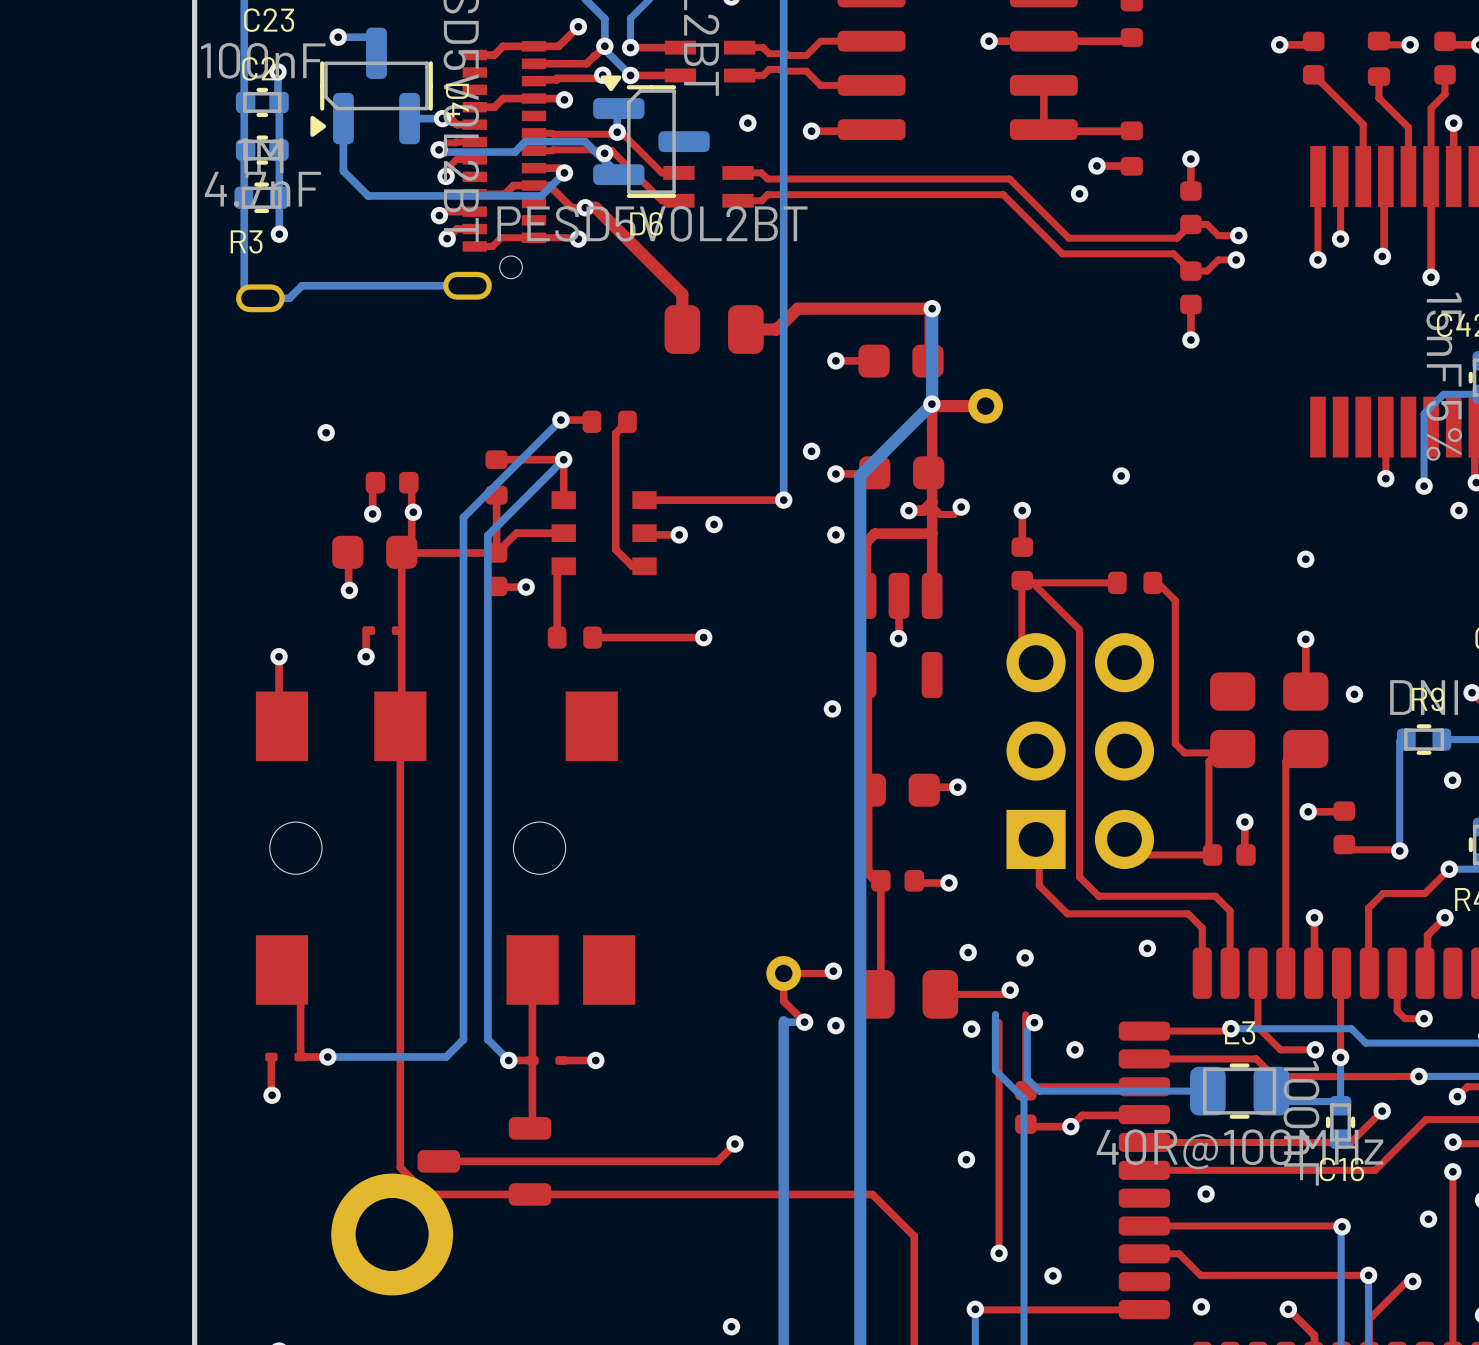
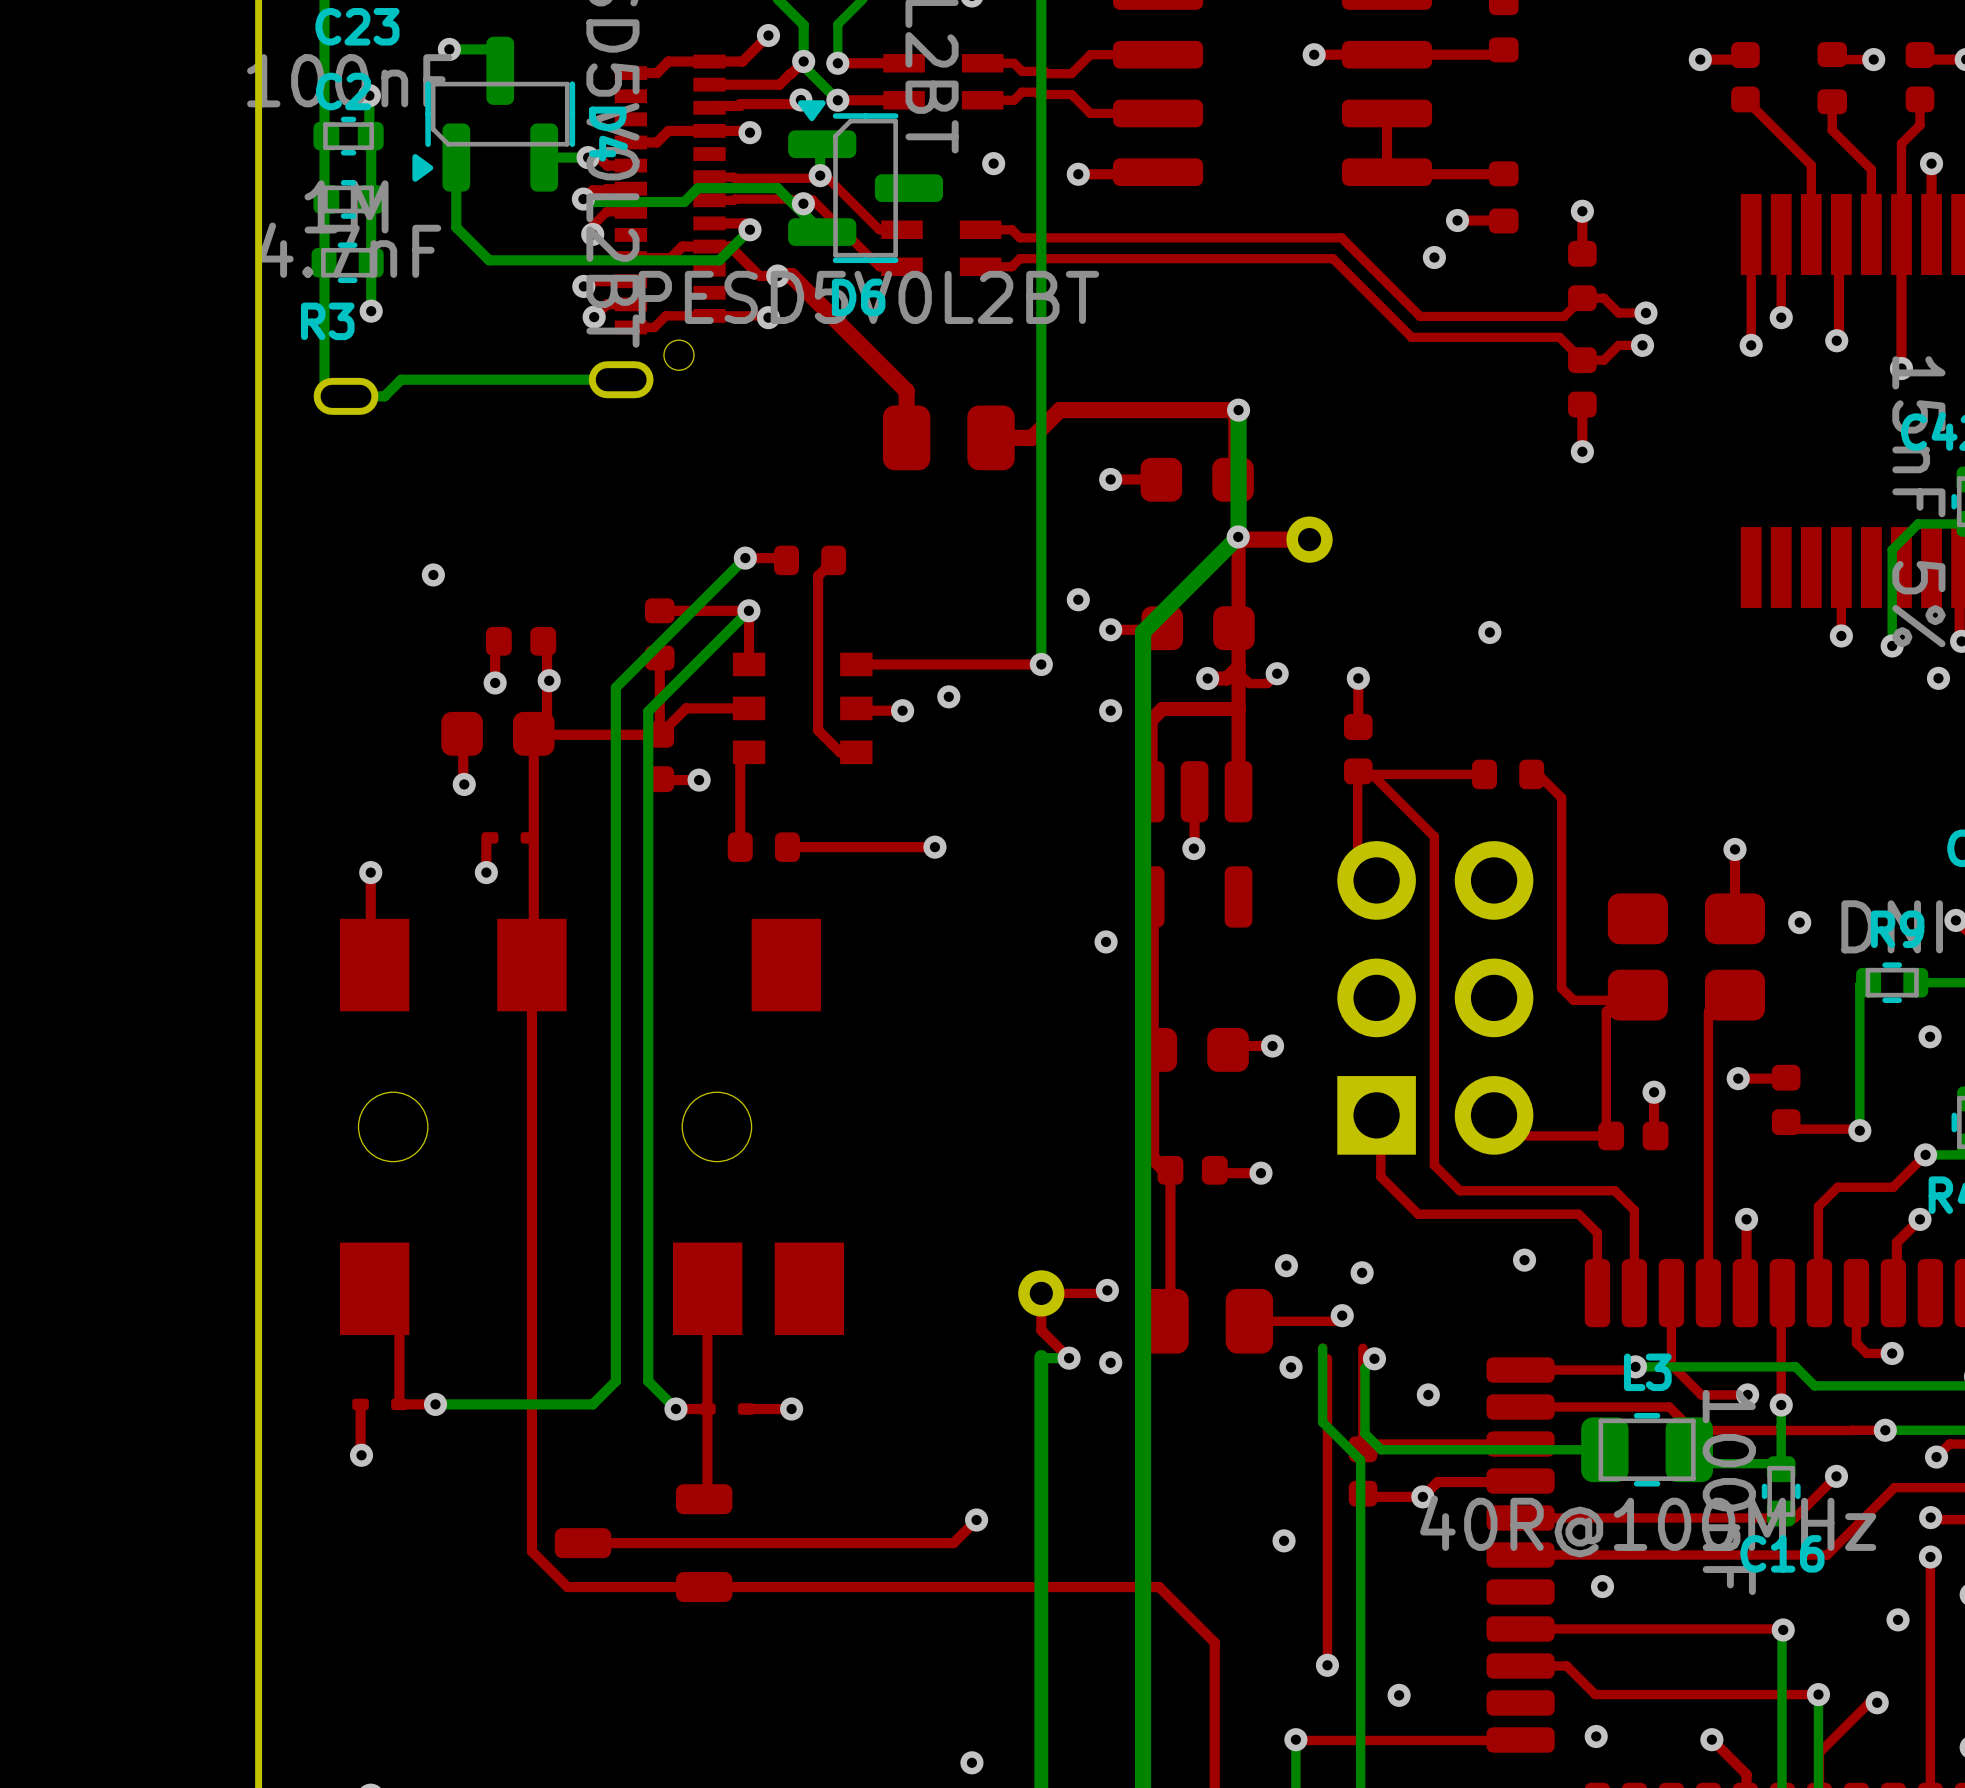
via: (1305, 559) -> none
part: (392, 1234) -> none

